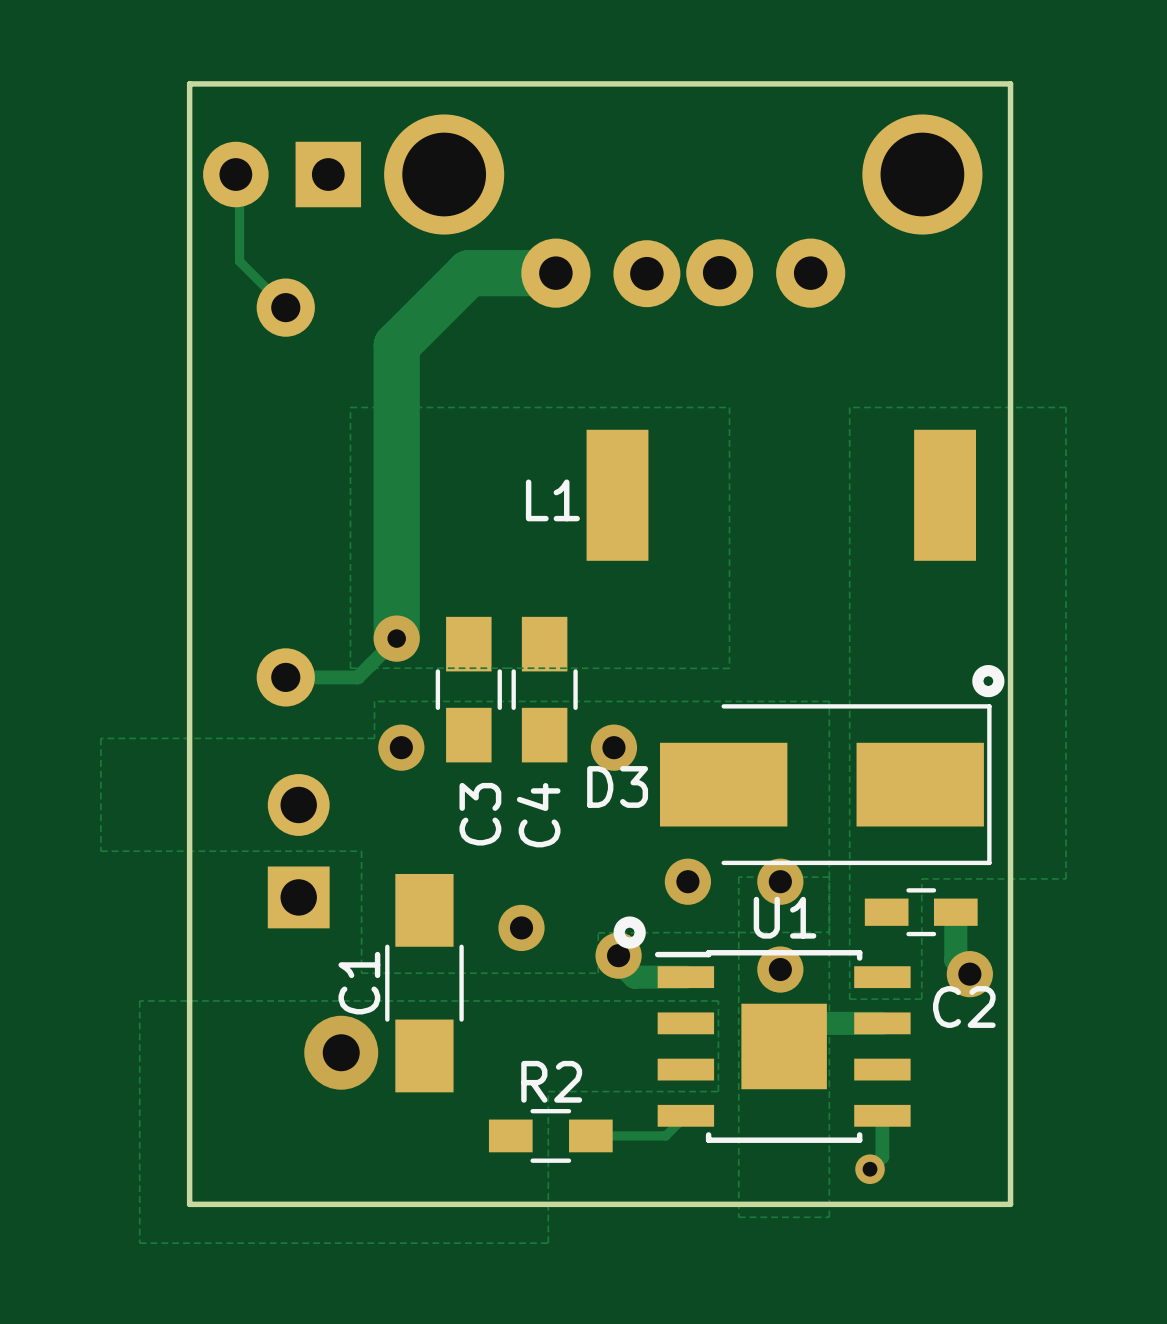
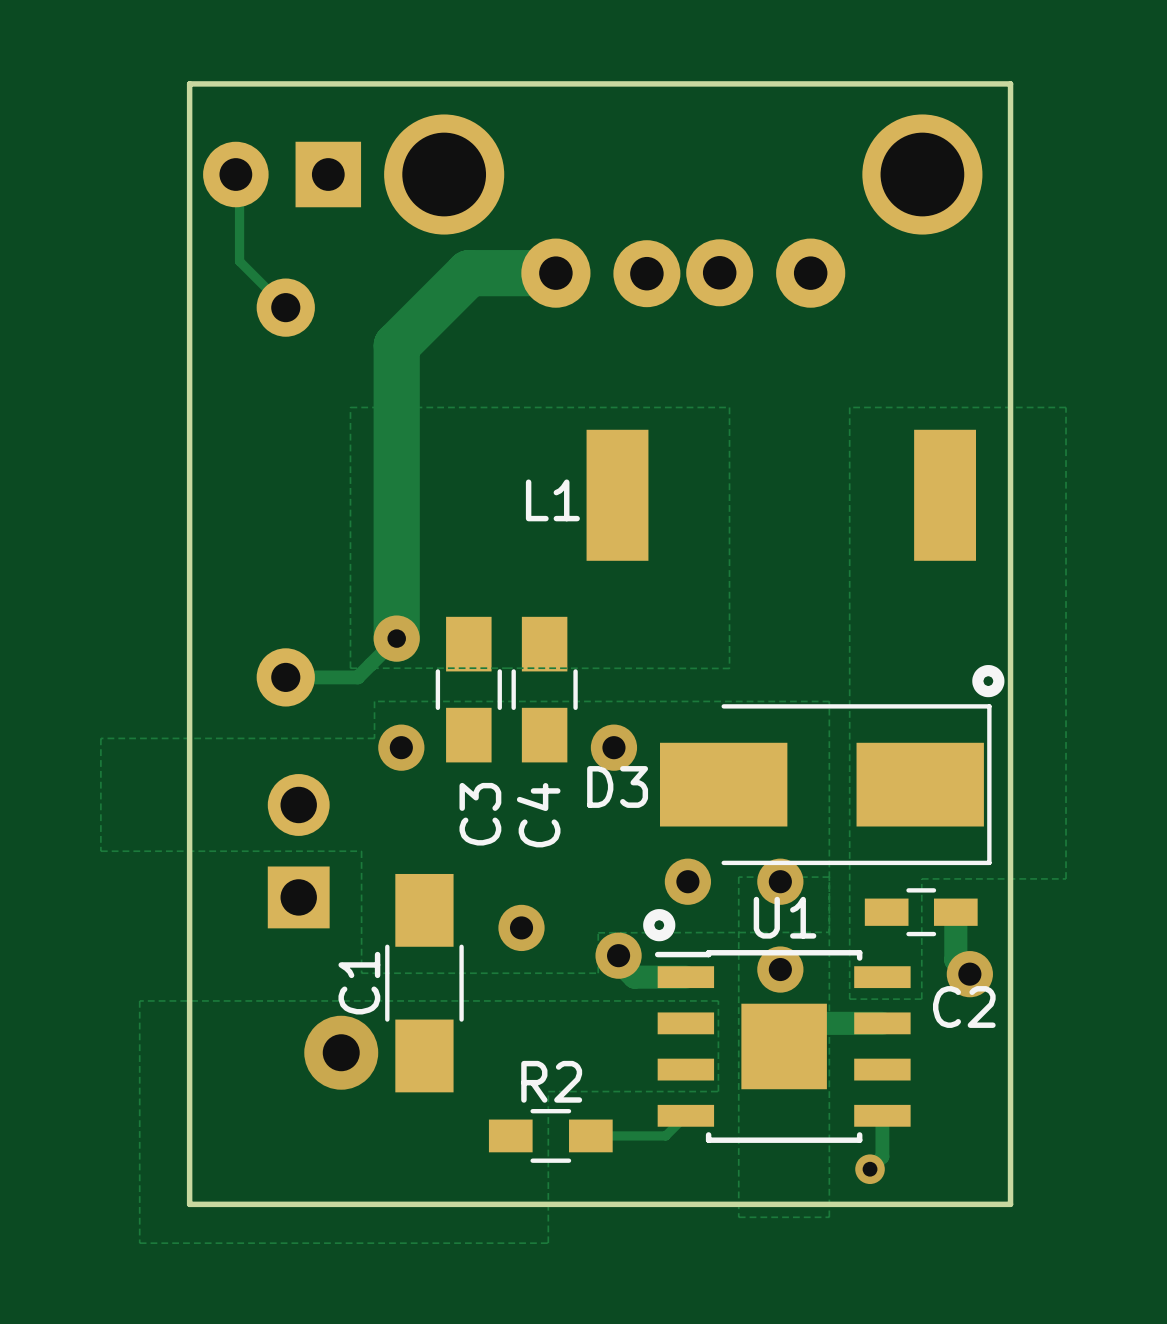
drawing position: (629, 932) -> (659, 925)

